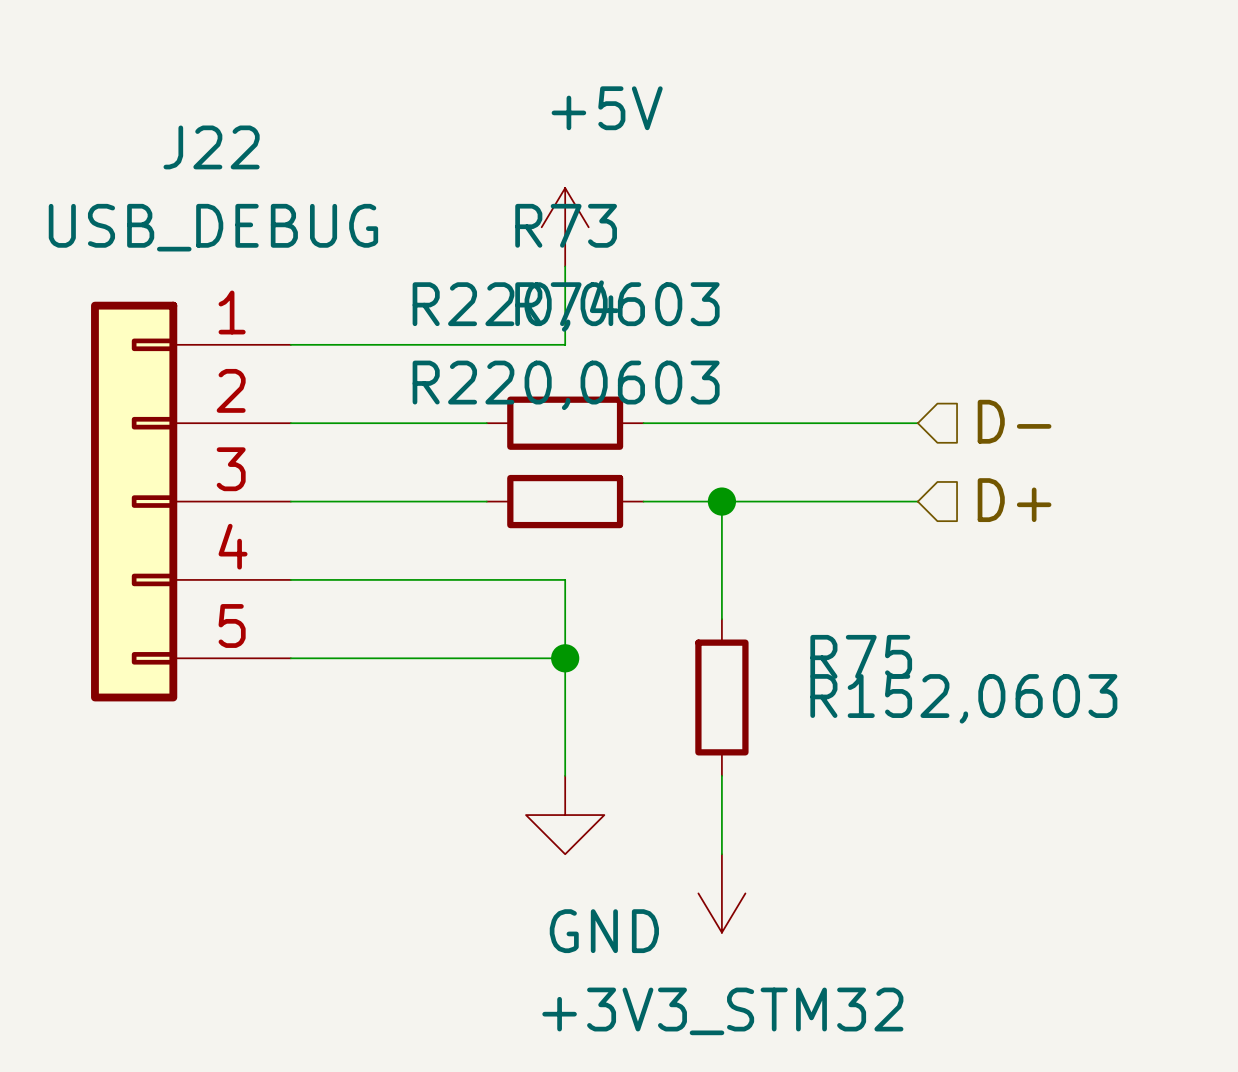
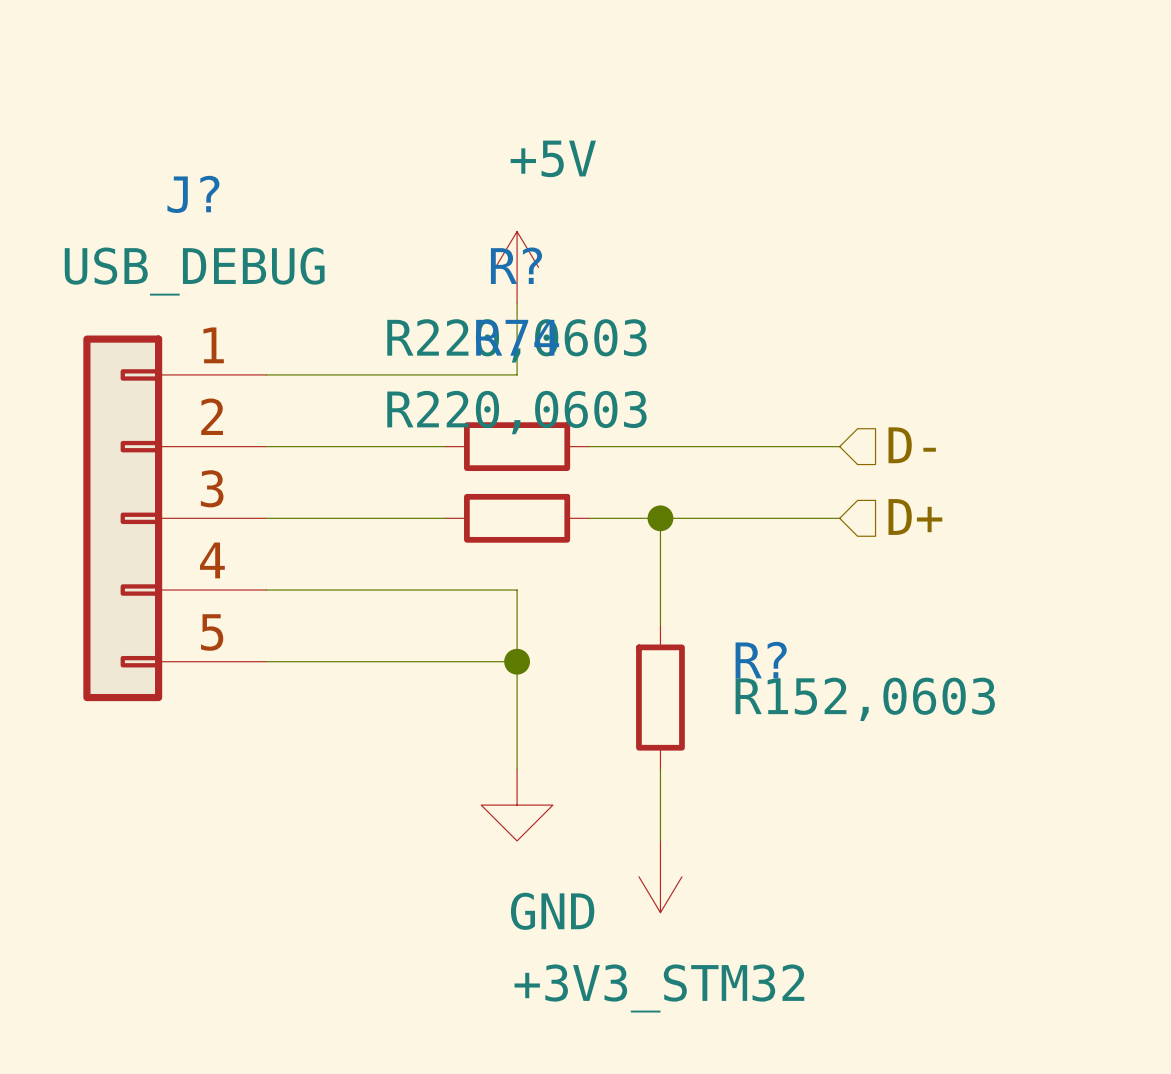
J22 name: J22 (211, 147) -> J? (193, 194)
R73 name: R73 (566, 225) -> R? (516, 265)
R75 name: R75 (861, 656) -> R? (761, 660)

